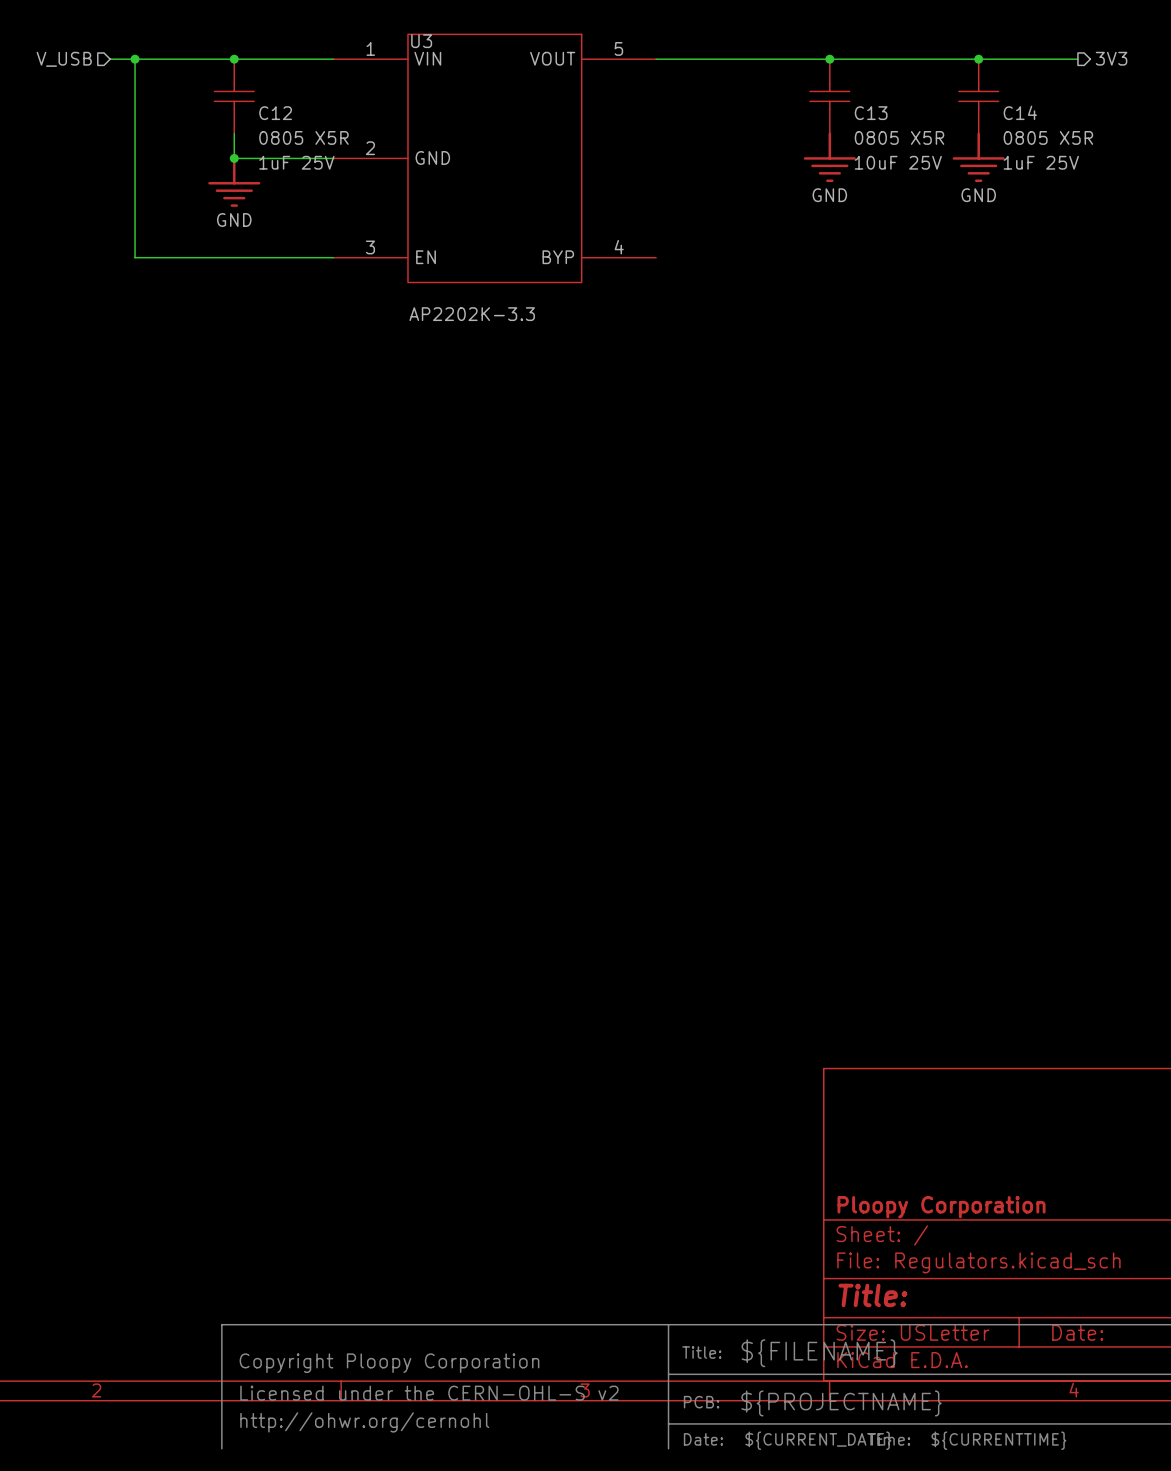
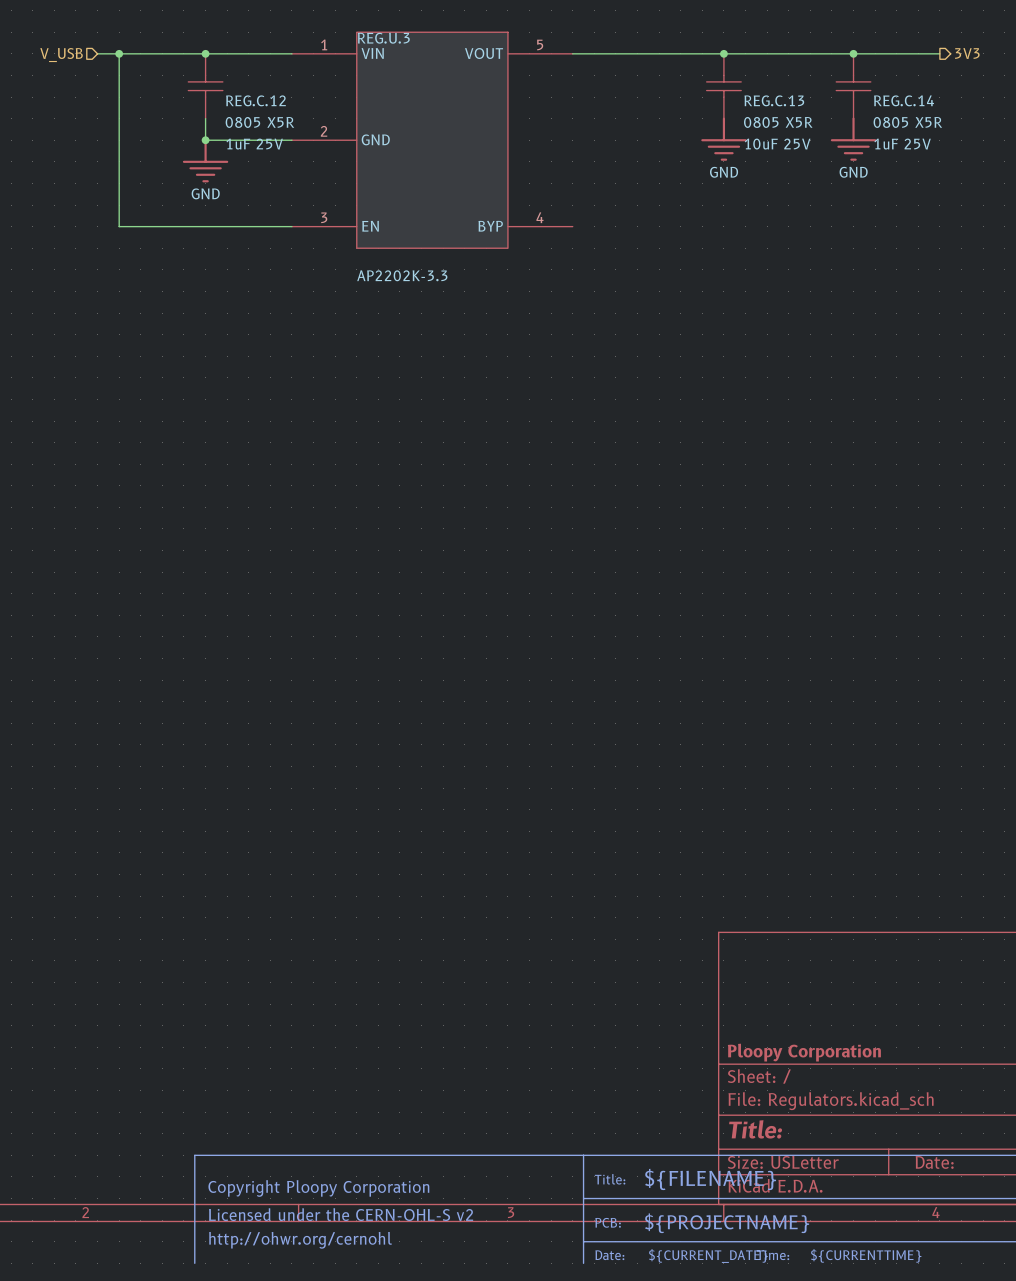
U3 name: U3 (421, 41) -> REG.U.3 (383, 38)
C14 name: C14 (1020, 112) -> REG.C.14 (904, 100)
C12 name: C12 (275, 113) -> REG.C.12 (255, 100)
C13 name: C13 (871, 113) -> REG.C.13 (774, 100)

